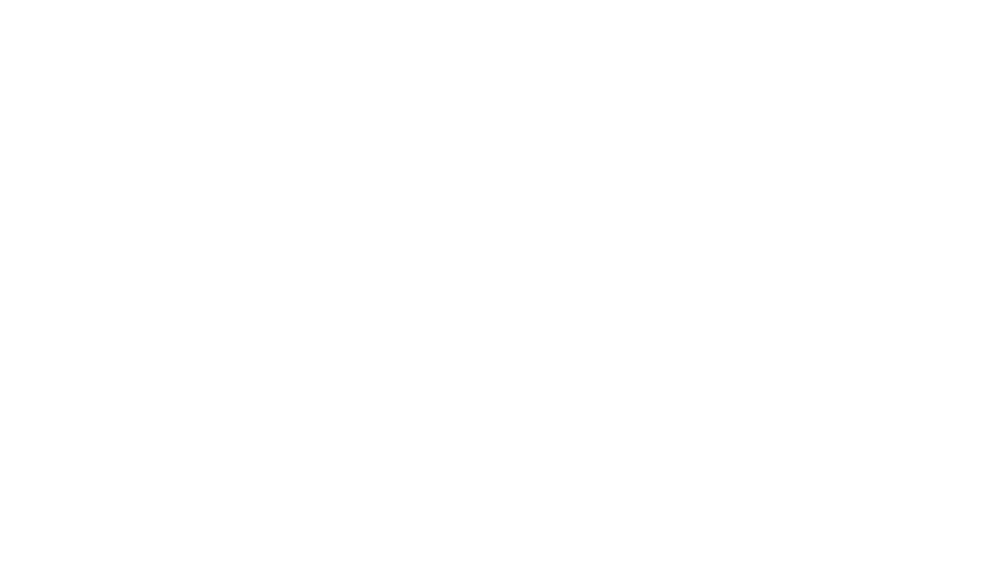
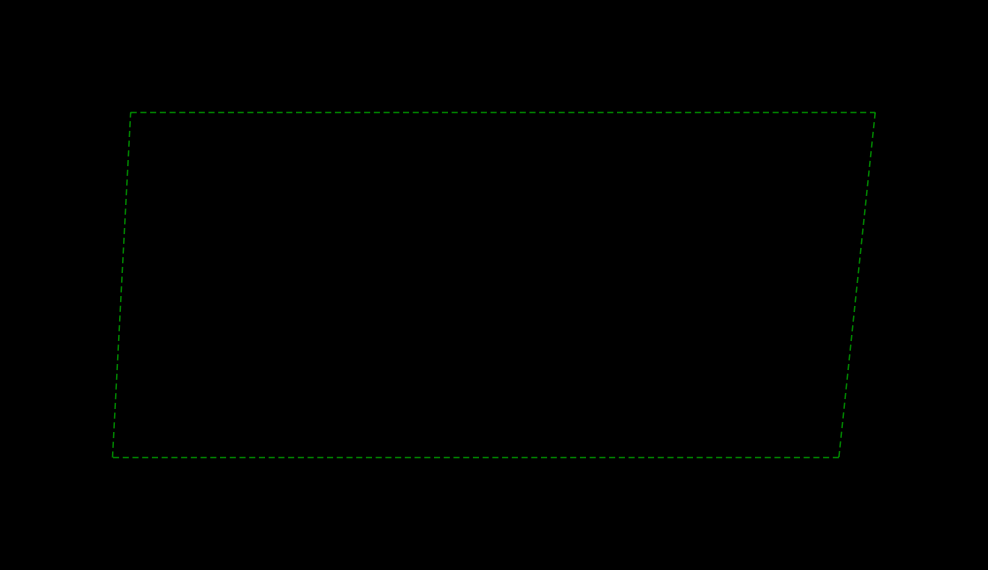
zone outline: none -> (875, 112) (130, 112) (112, 457) (838, 457) (875, 112)

